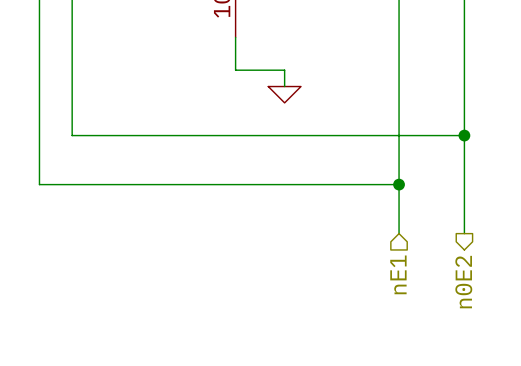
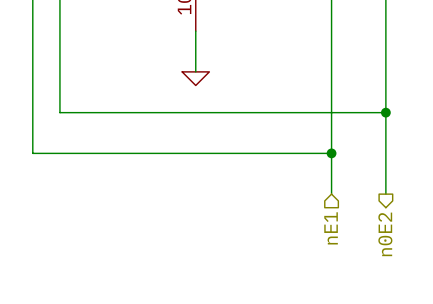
wire: (235, 70) (284, 70) (284, 86) -> (195, 58) (195, 71)
power symbol position: (284, 94) -> (195, 78)

